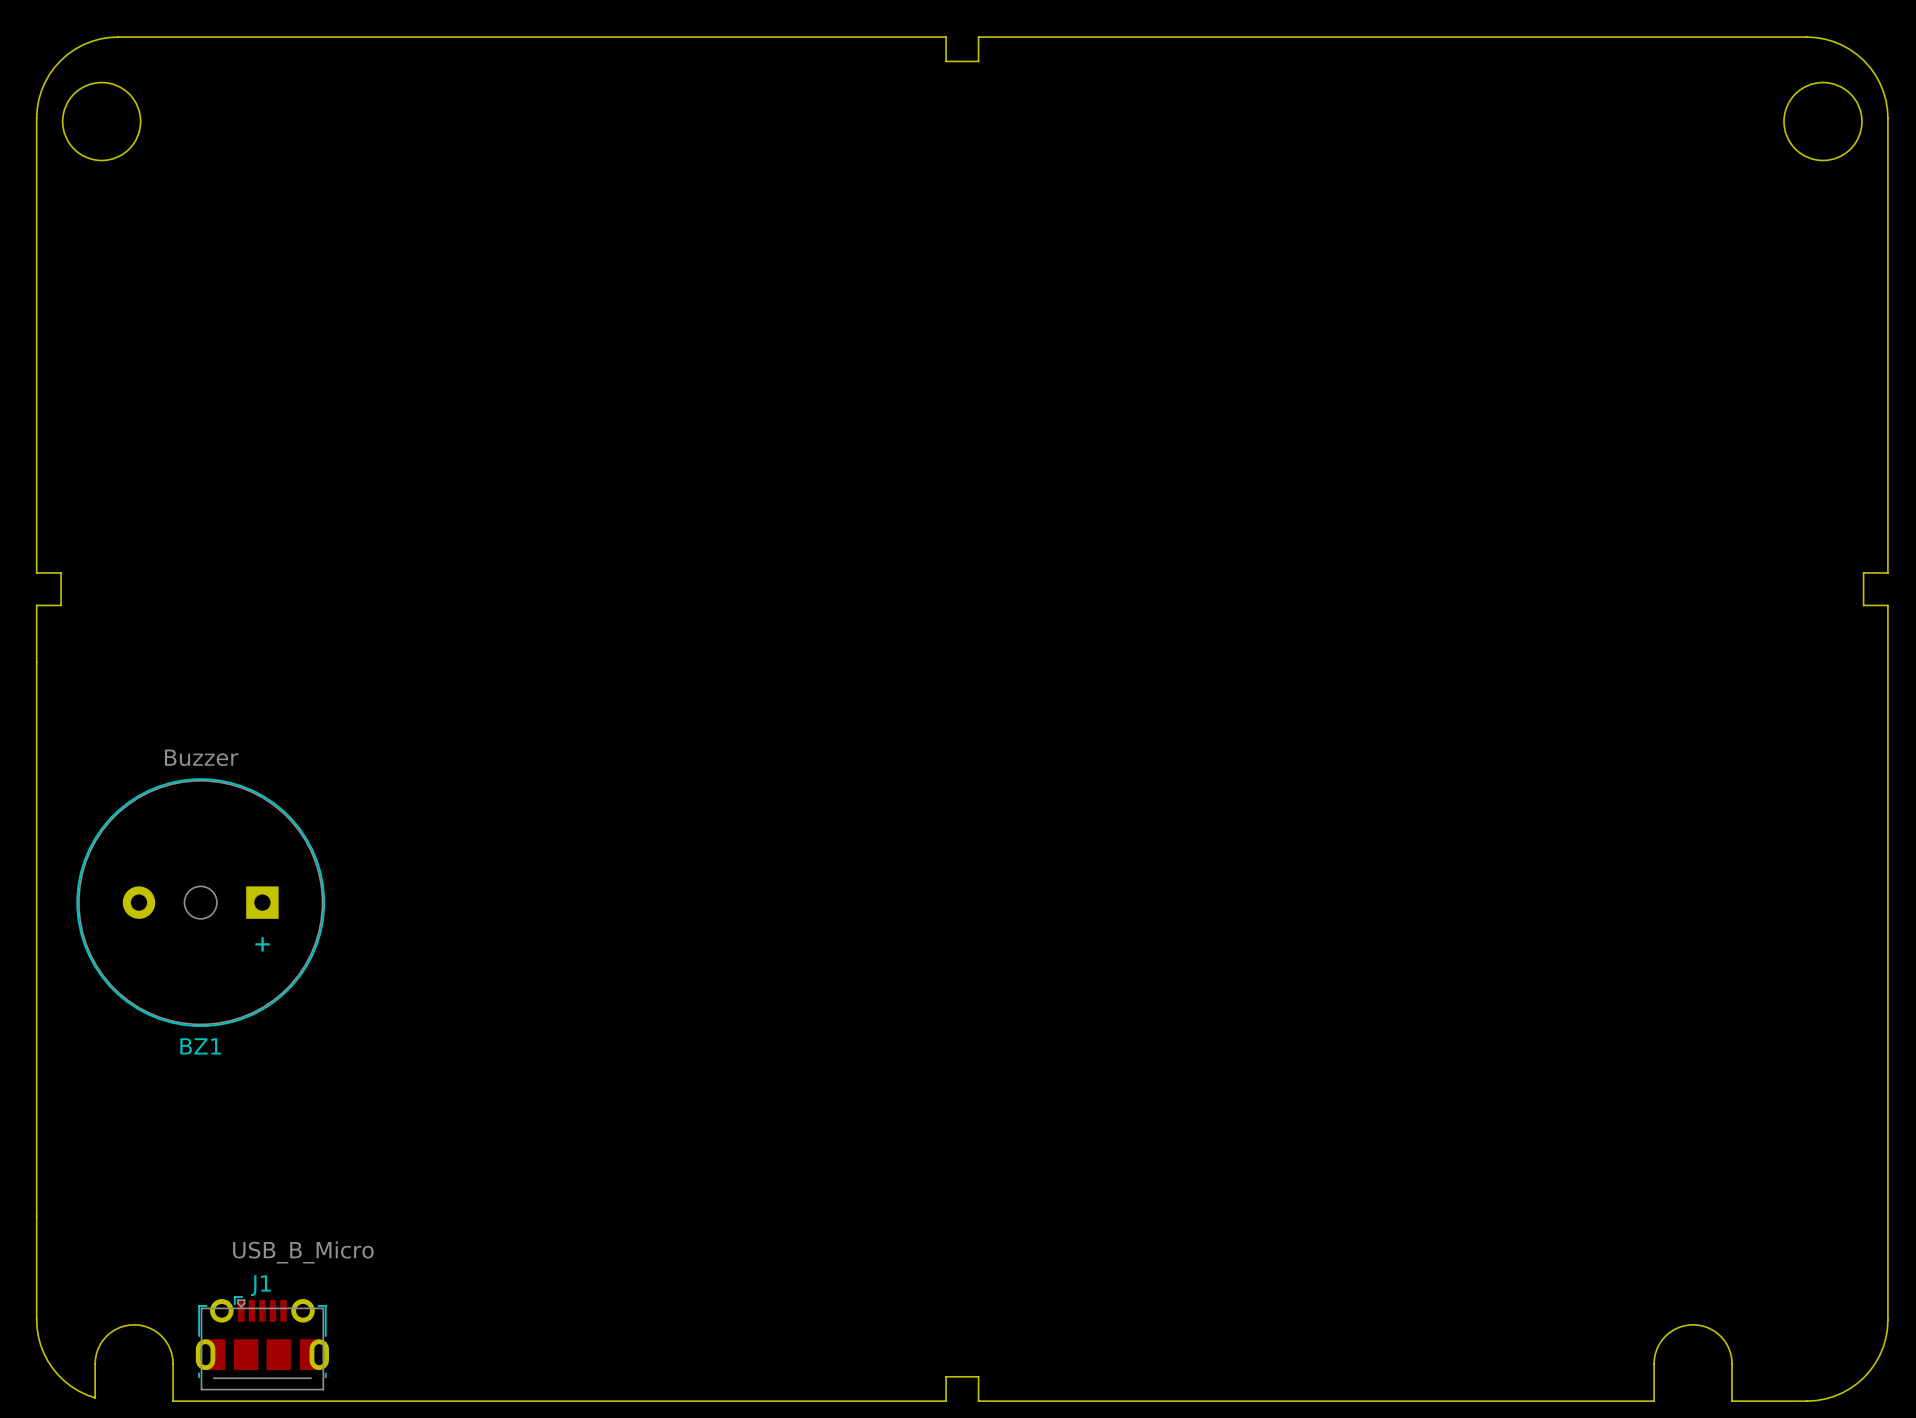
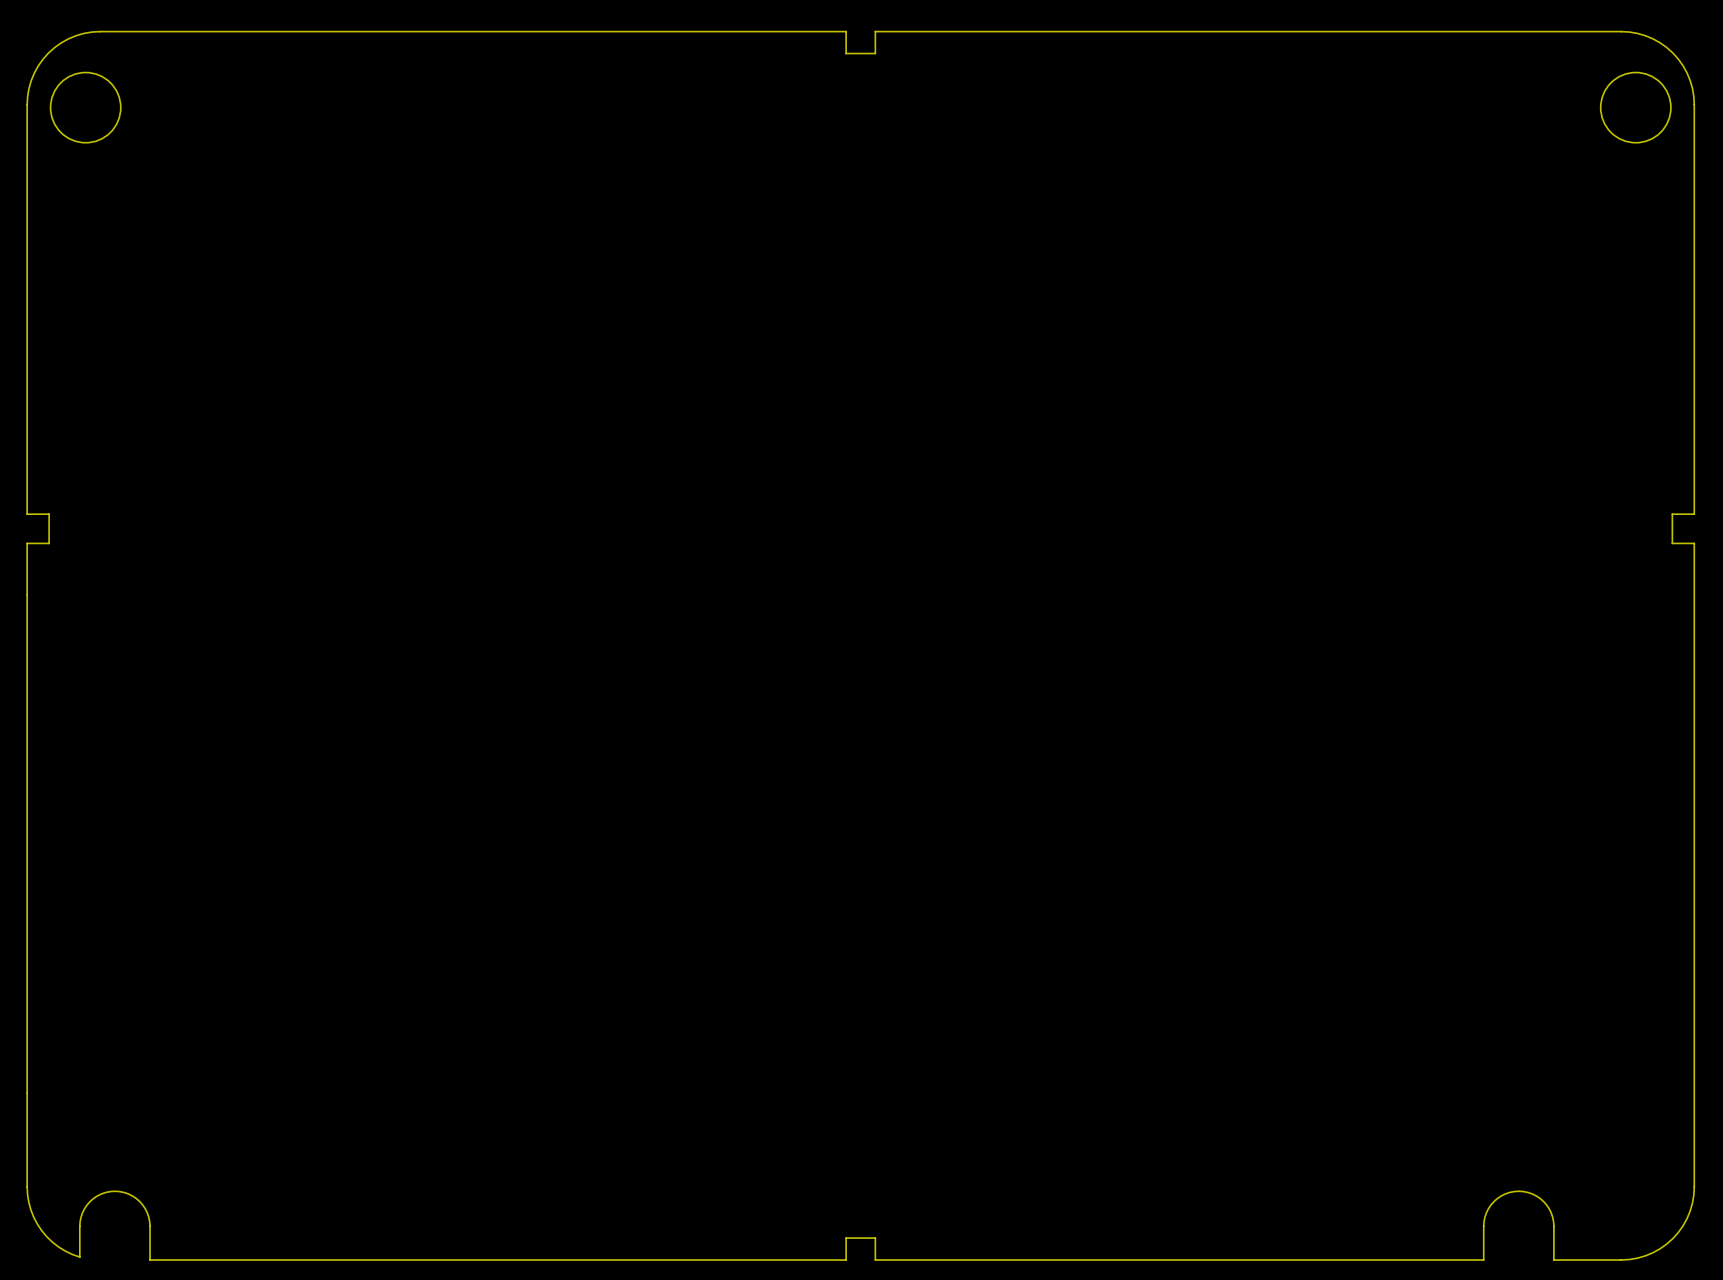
BZ1: Buzzer (200, 902) -> none
J1: USB_B_Micro (262, 1343) -> none

